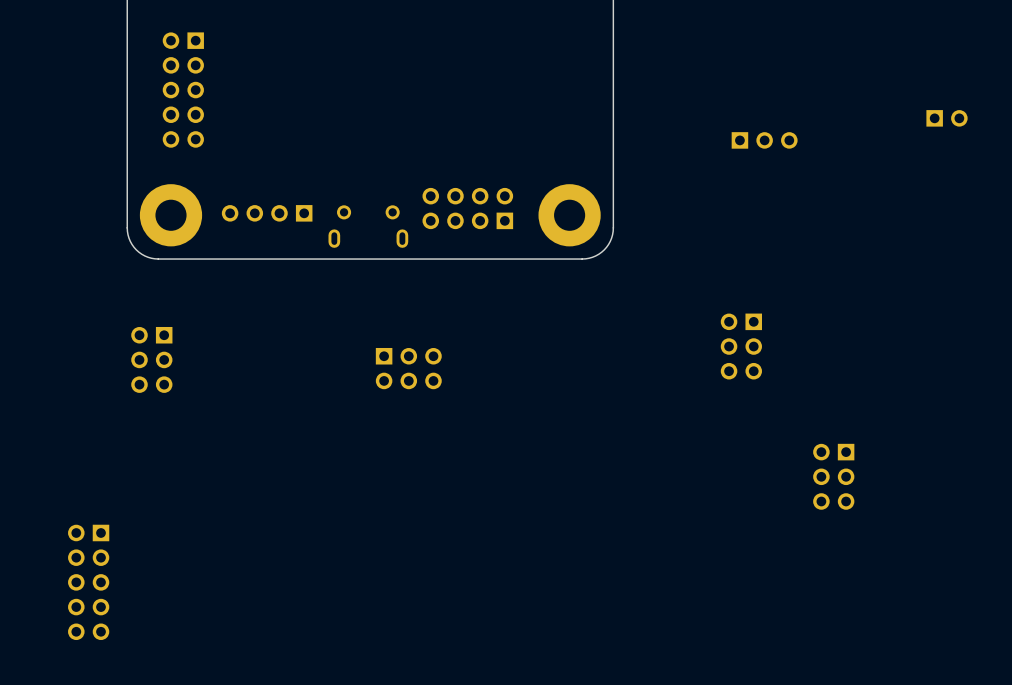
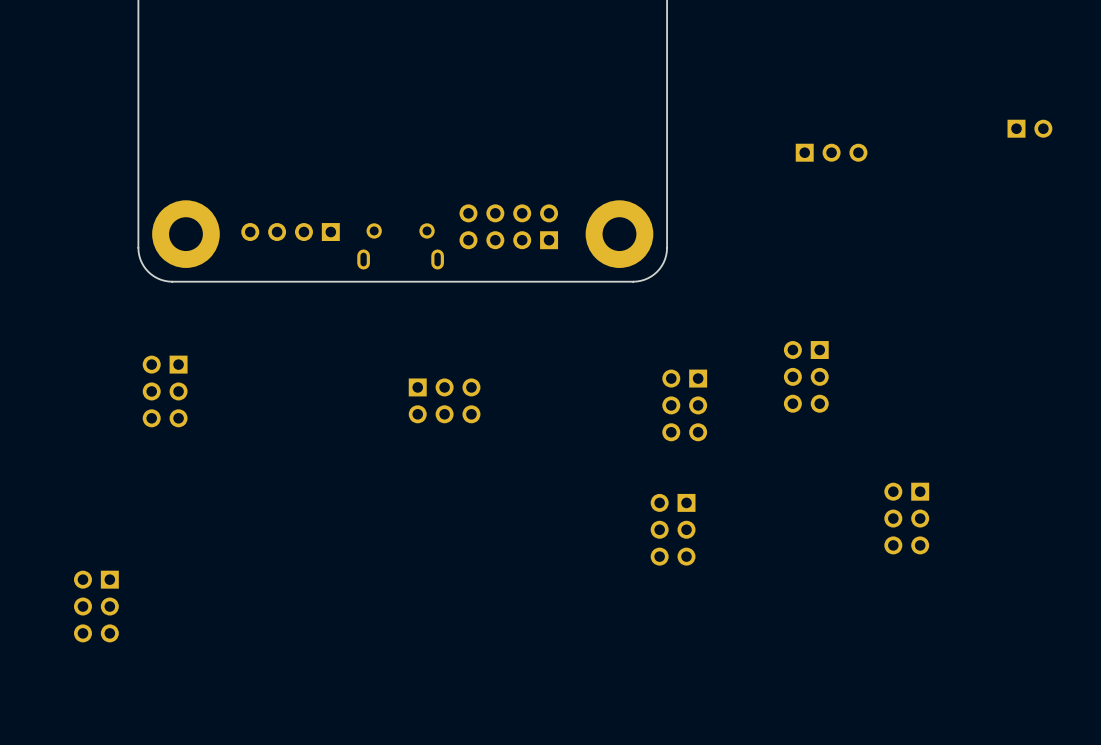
part: (183, 90) -> none
part: none -> (684, 405)
part: none -> (673, 529)
part: (88, 582) -> none

